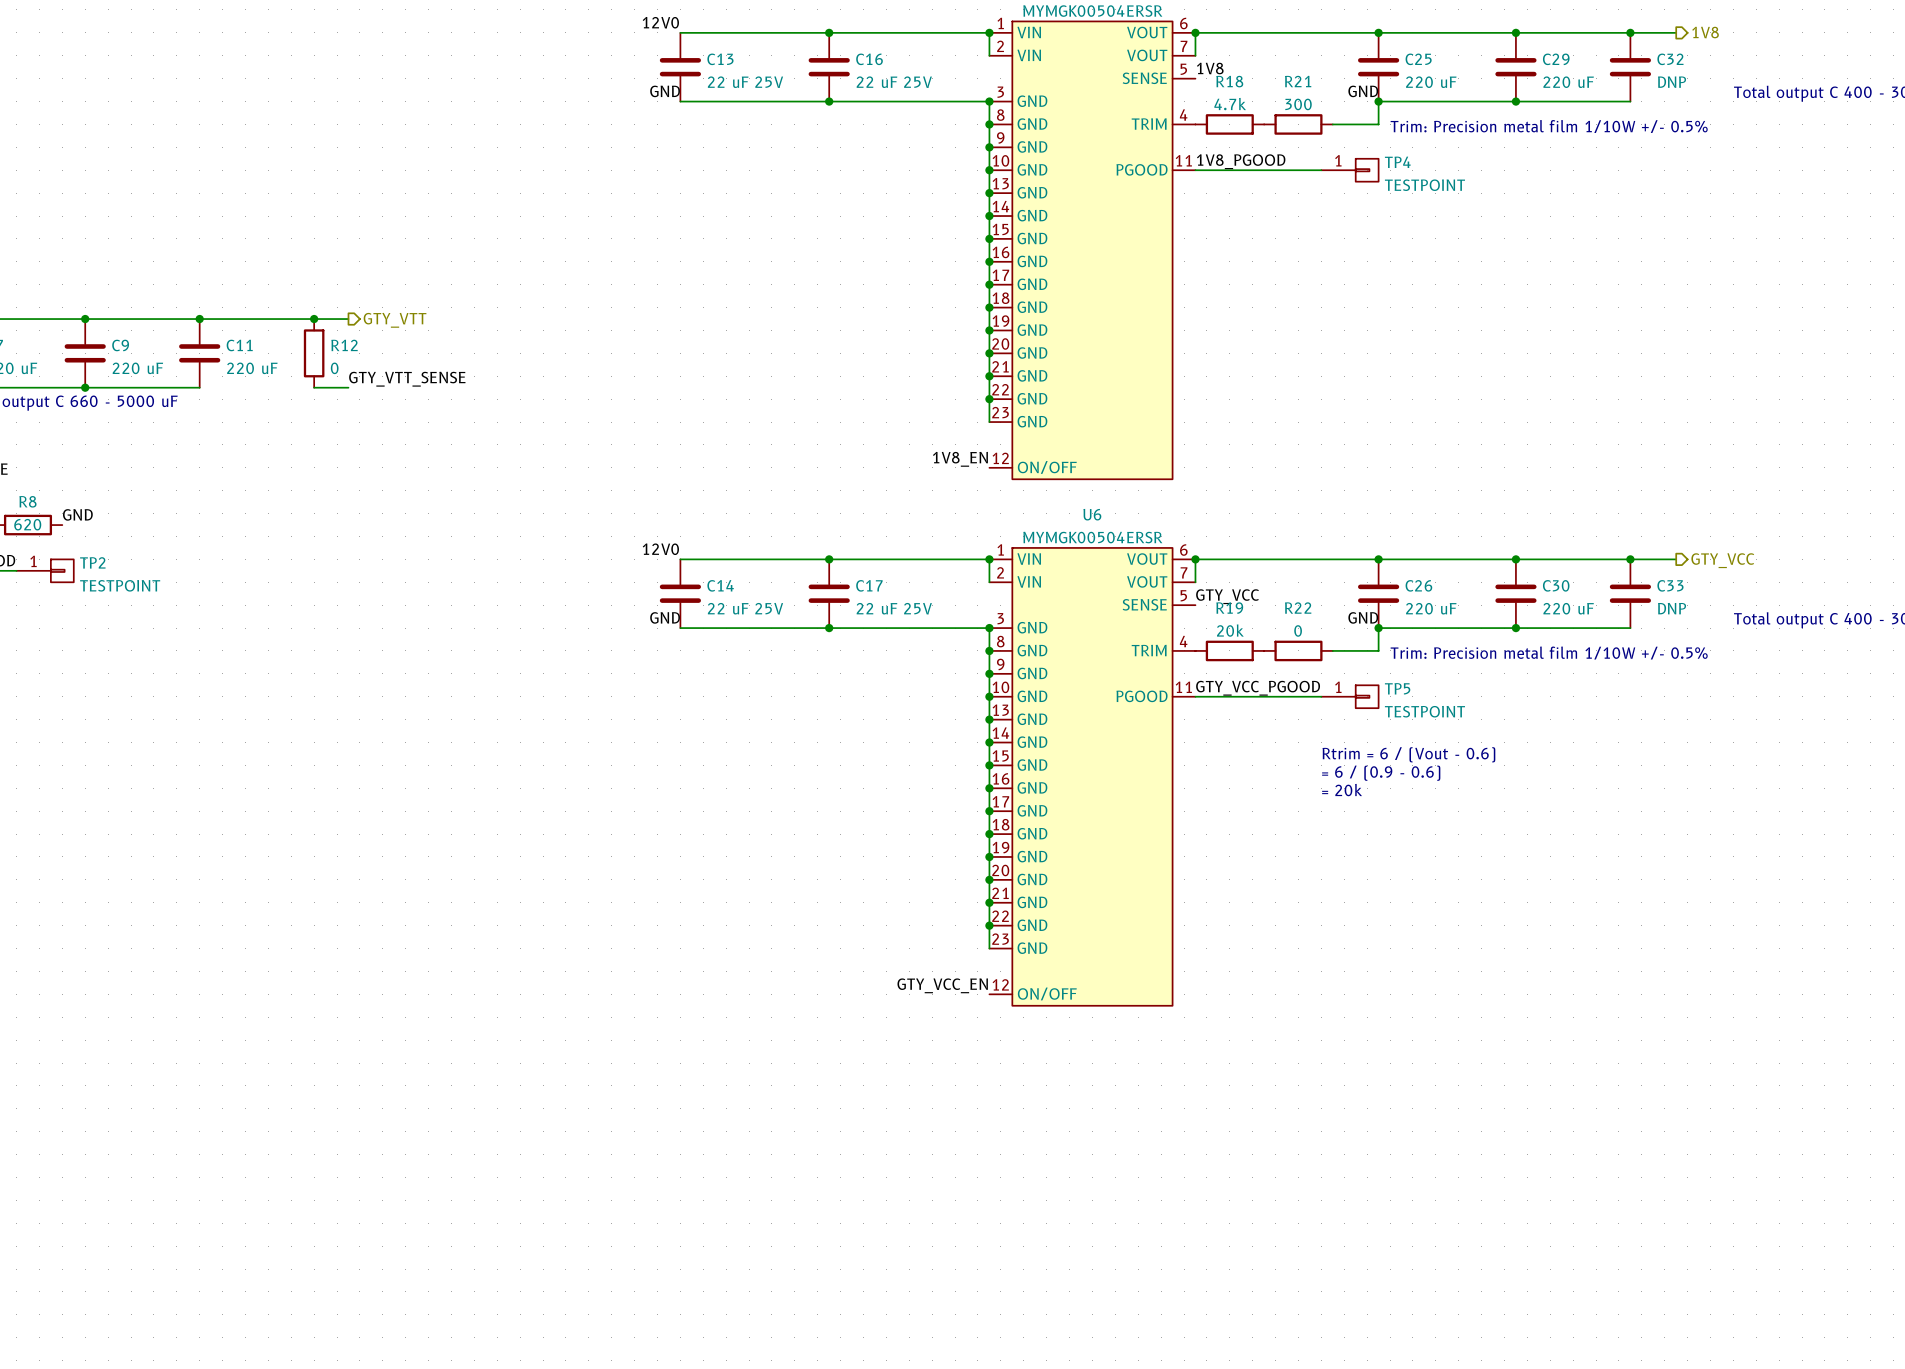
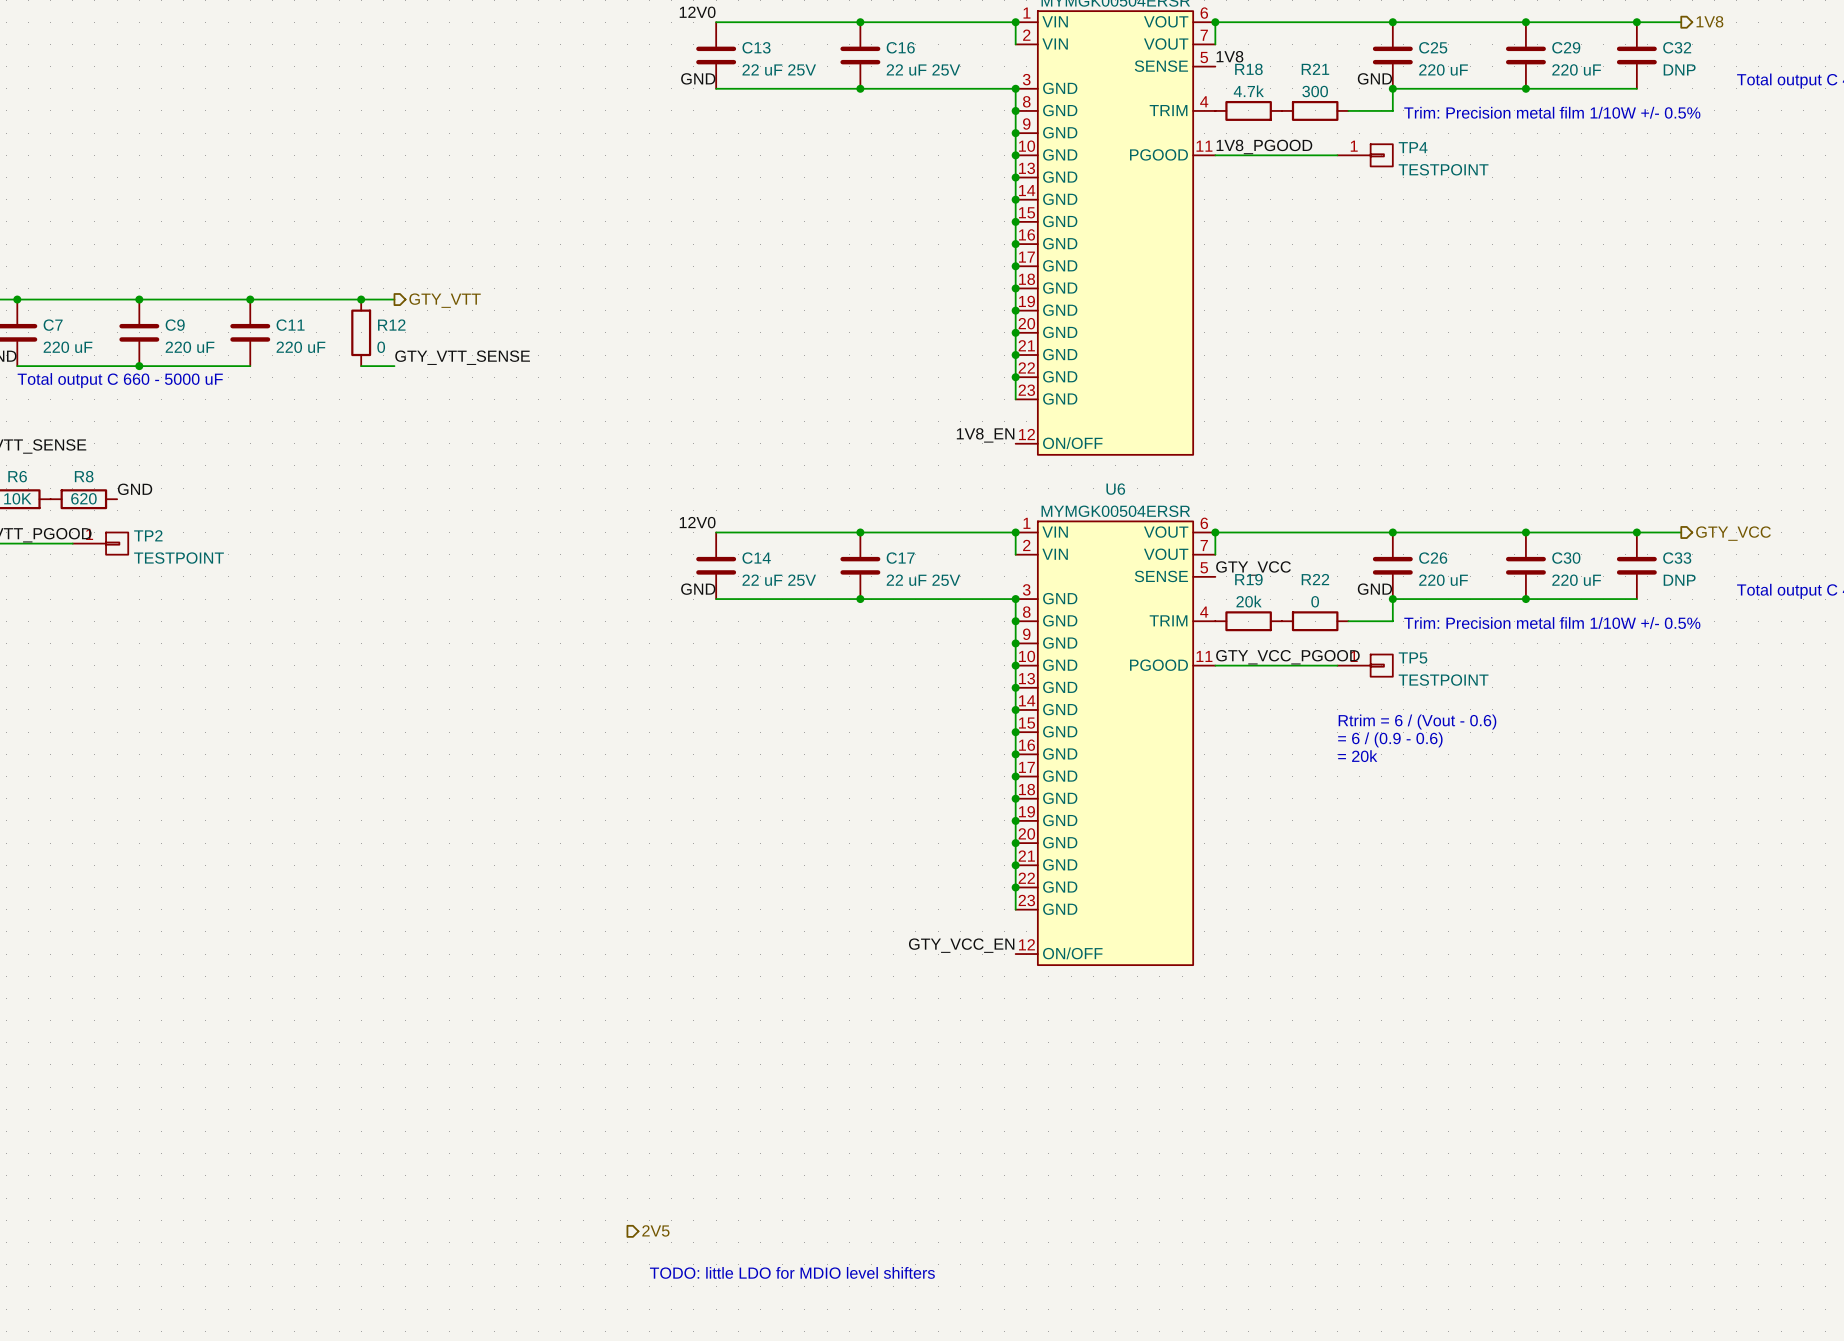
hierarchical label: none -> 2V5 (655, 1230)
text: none -> TODO: little LDO for MDIO level shifters (792, 1272)

